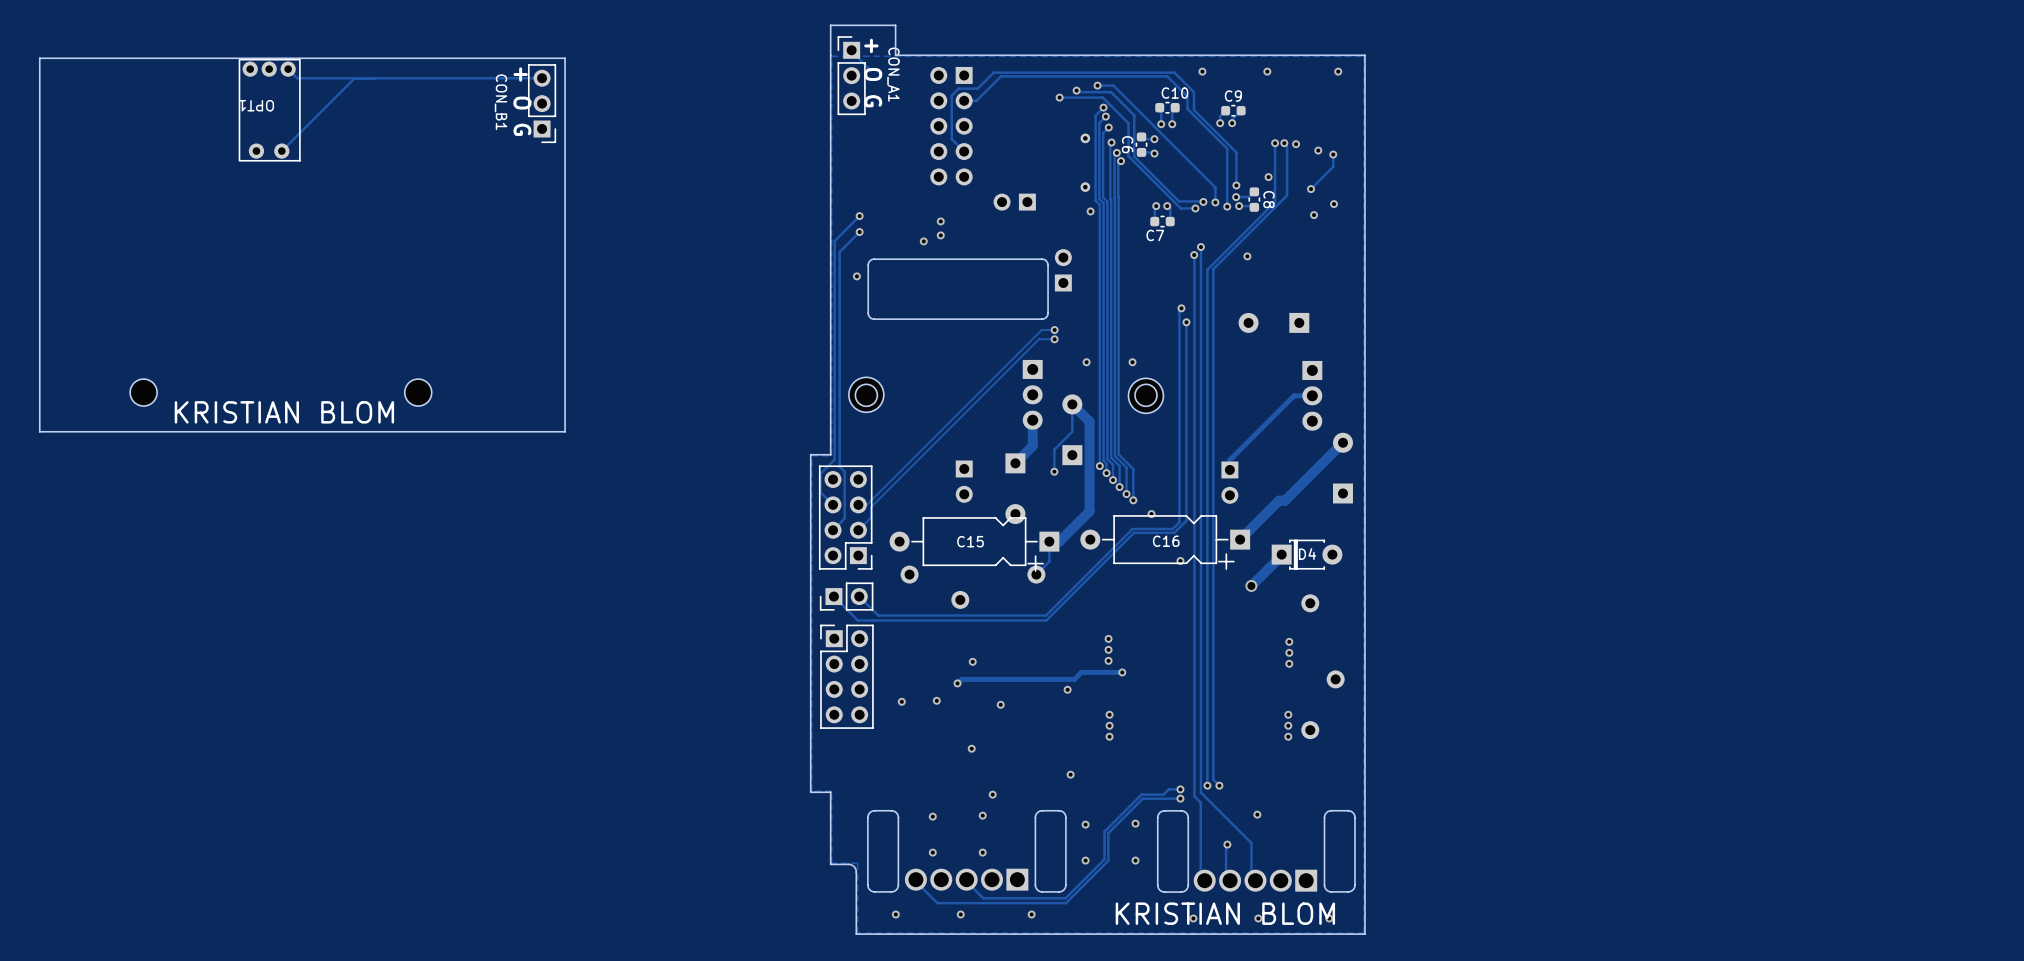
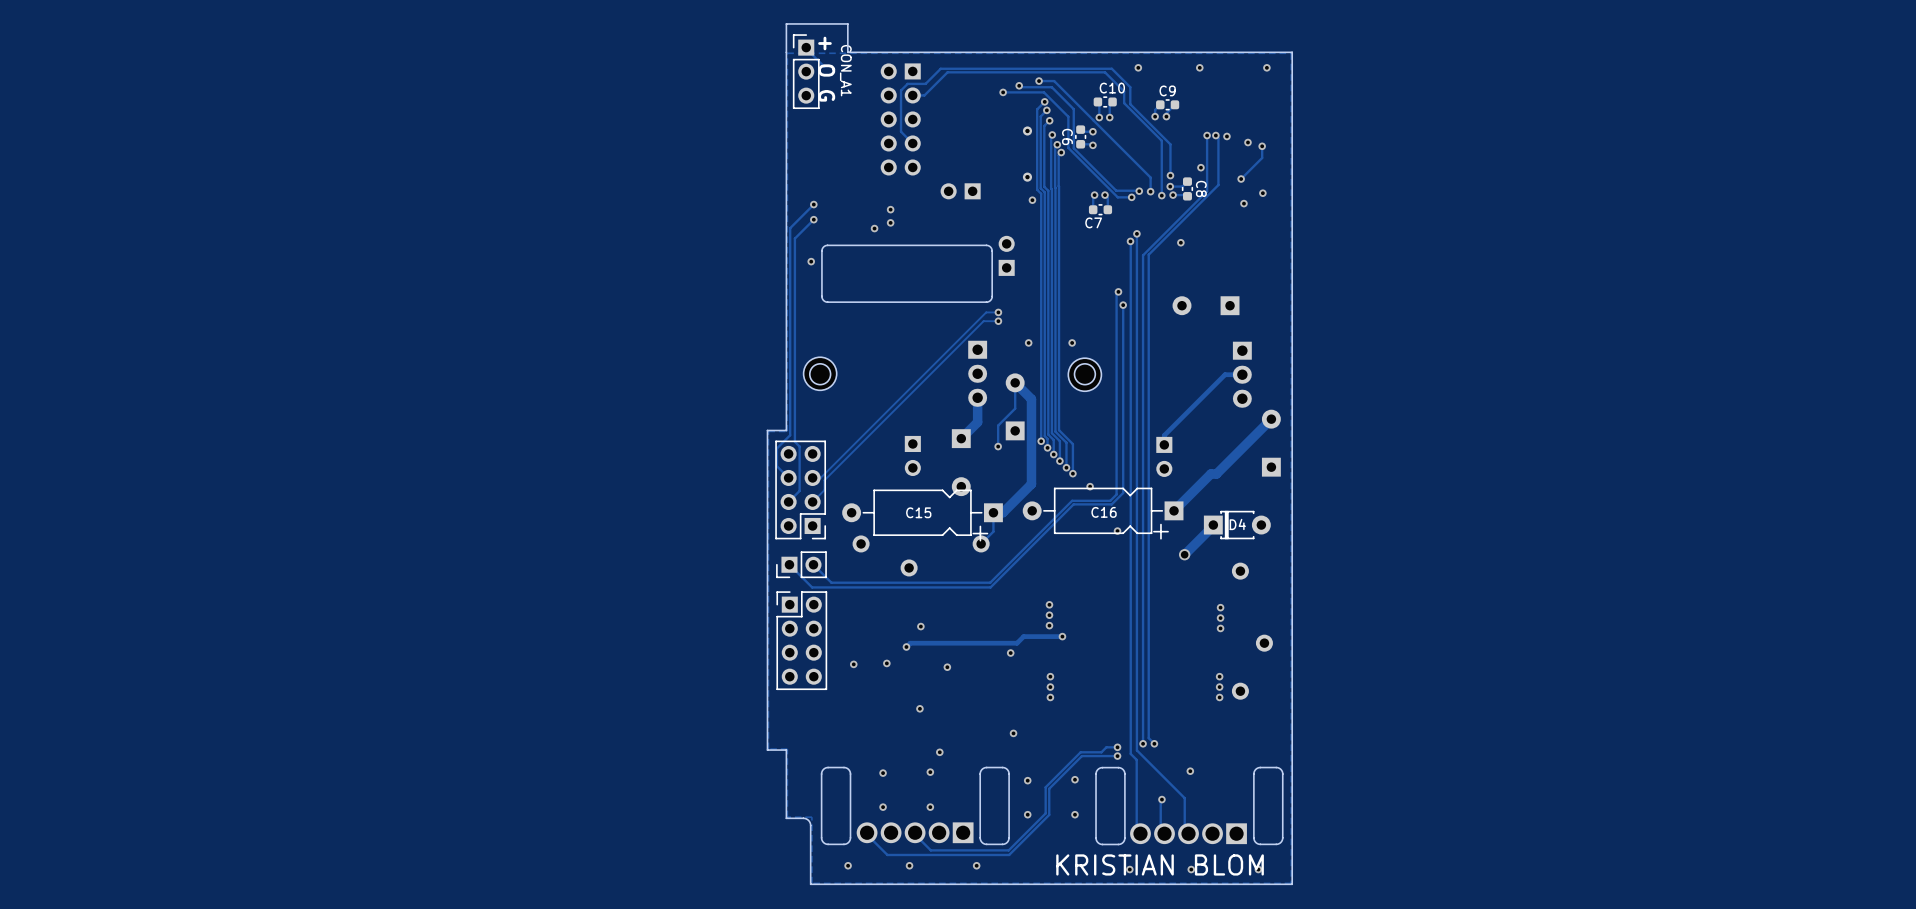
board edge: (565, 58) (39, 58) (39, 431) (565, 431) (565, 58) -> none
track: (288, 69) (297, 78) (542, 78) -> none
track: (354, 78) (281, 151) -> none
text: + O G (522, 101) -> none
CON_B1: (542, 103) -> none
OPT1: (269, 110) -> none
part: (143, 392) -> none
part: (418, 392) -> none
text: KRISTIAN BLOM (284, 412) -> none

